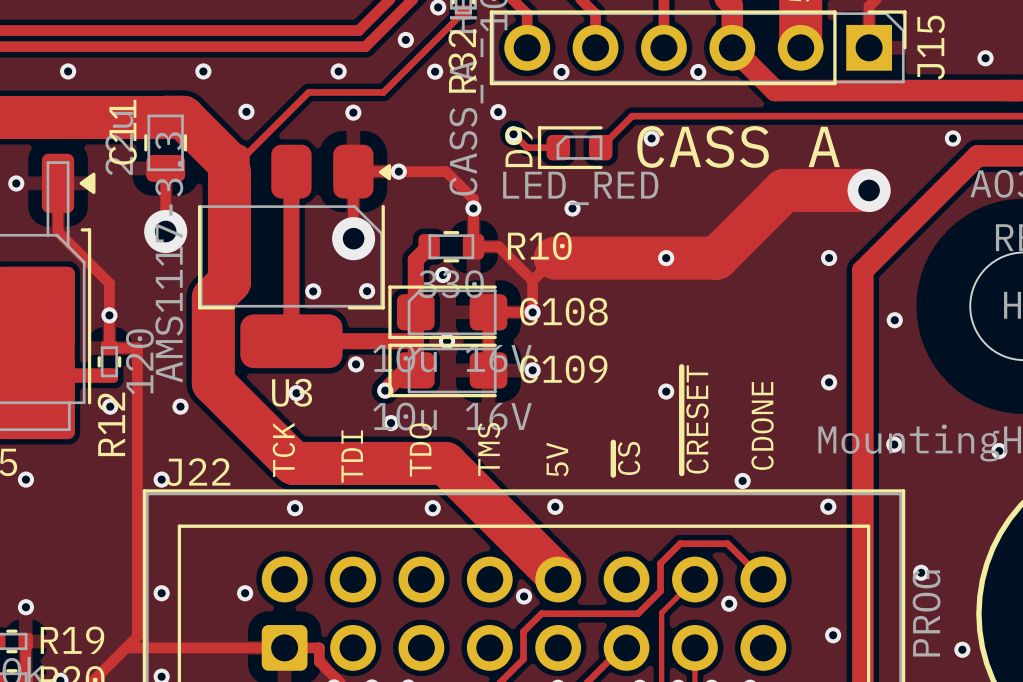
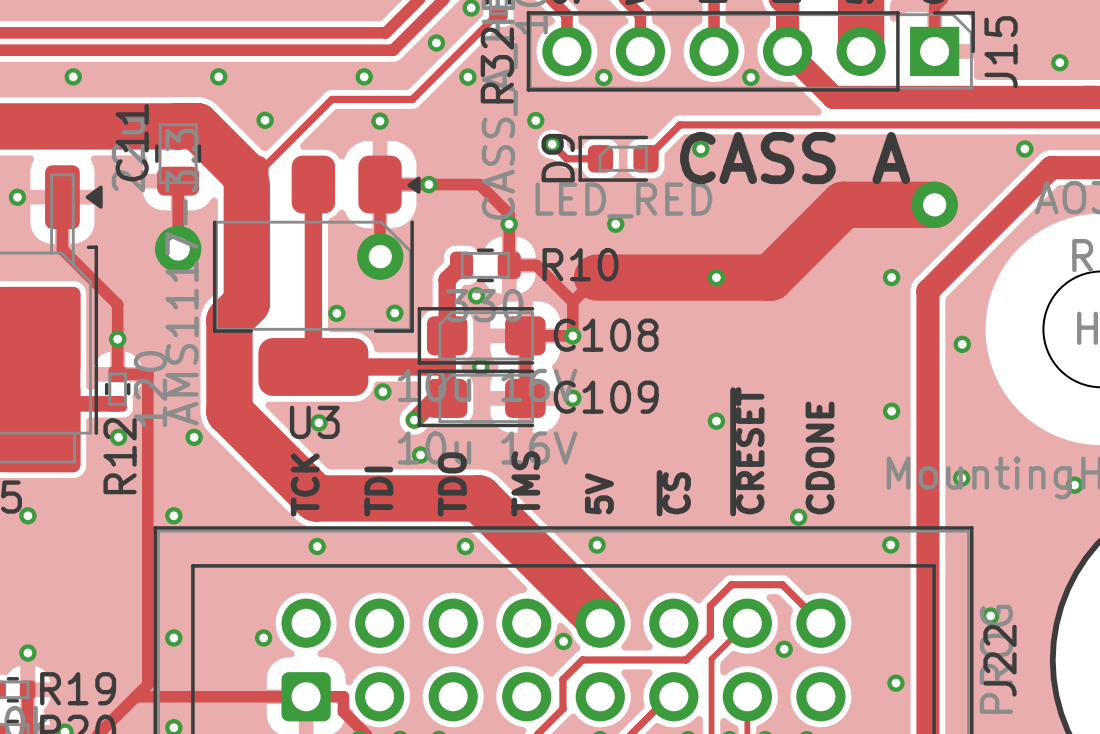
J22 name rotation: 0° (198, 472) -> 90° counterclockwise (999, 660)
J22 name position: J22 (198, 472) -> J22 (999, 660)
via: (962, 649) -> none

